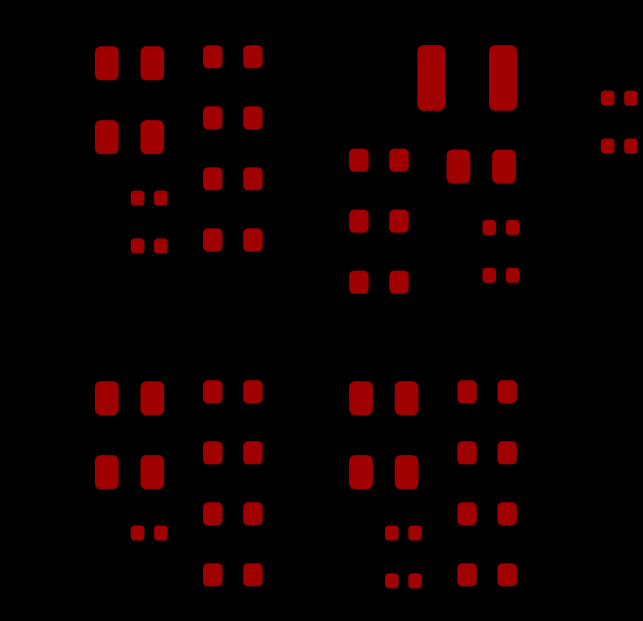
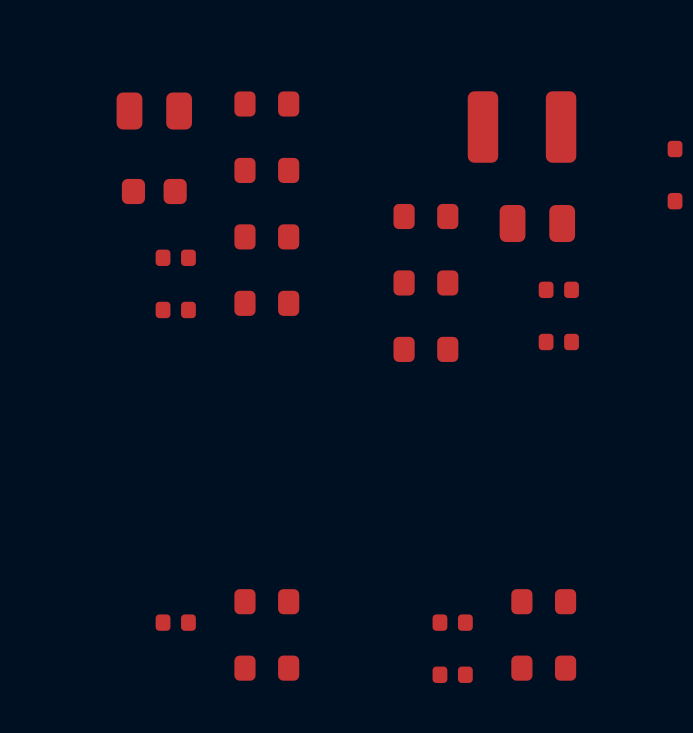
part footprint: [94, 120, 165, 155] -> [121, 178, 187, 205]
part: (232, 391) -> none
part: (487, 391) -> none
part: (129, 398) -> none
part: (383, 398) -> none
part: (232, 452) -> none
part: (487, 452) -> none
part: (129, 472) -> none
part: (383, 472) -> none

